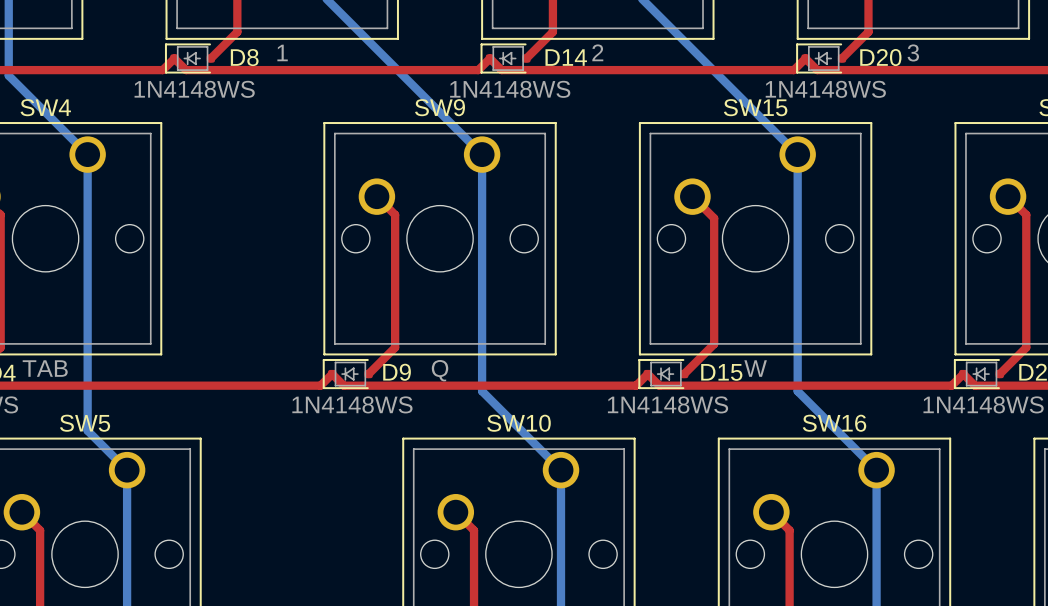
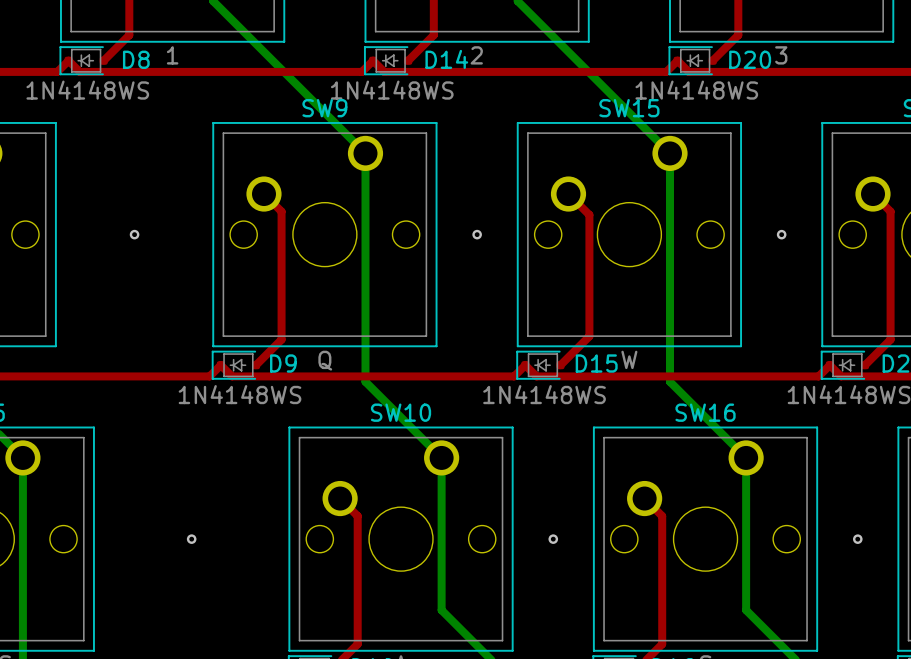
via: none -> (134, 234)
via: none -> (477, 234)
via: none -> (781, 234)
via: none -> (191, 539)
via: none -> (553, 539)
via: none -> (857, 539)

